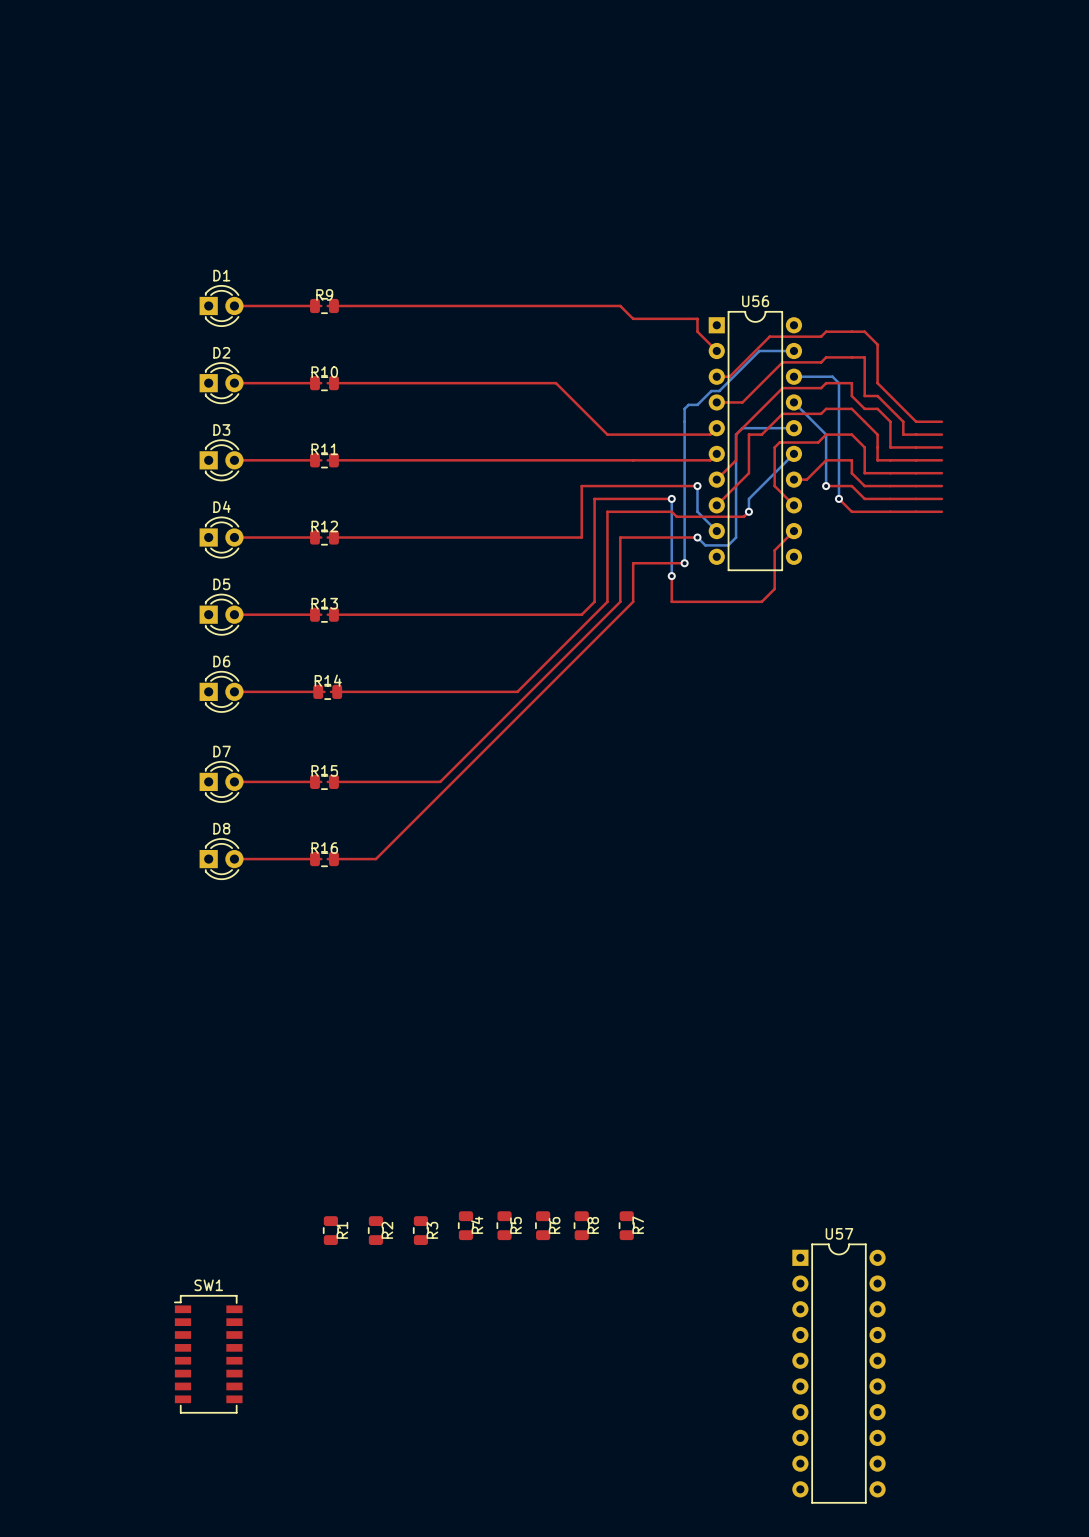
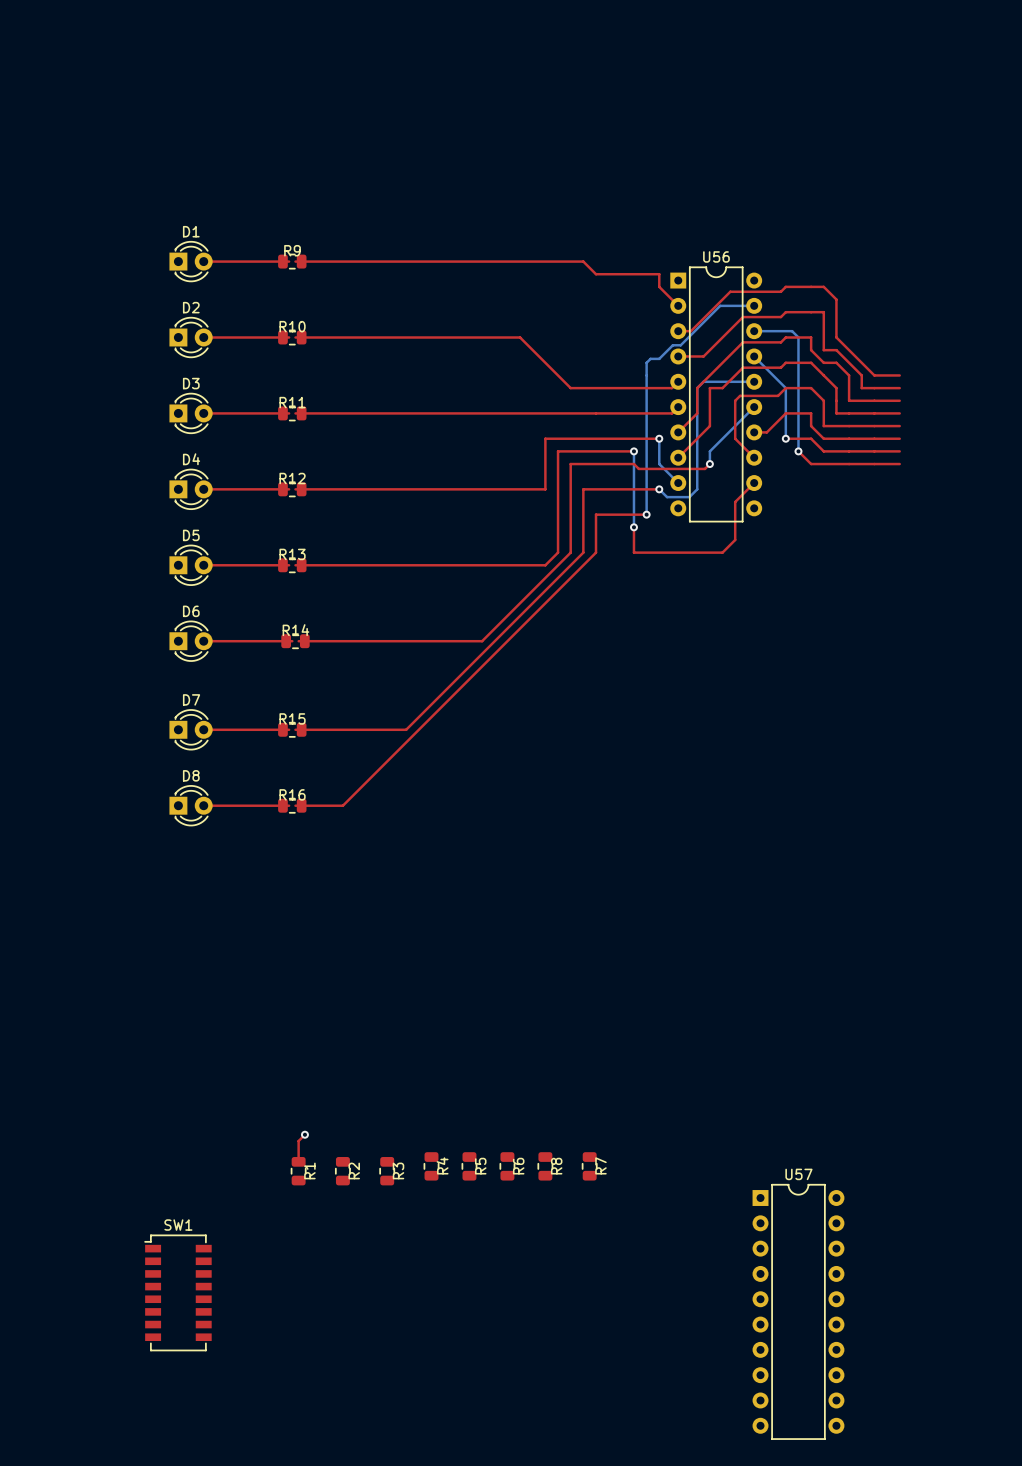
top track: none -> (304, 1134) (298, 1141) (298, 1161)
via: none -> (304, 1134)

